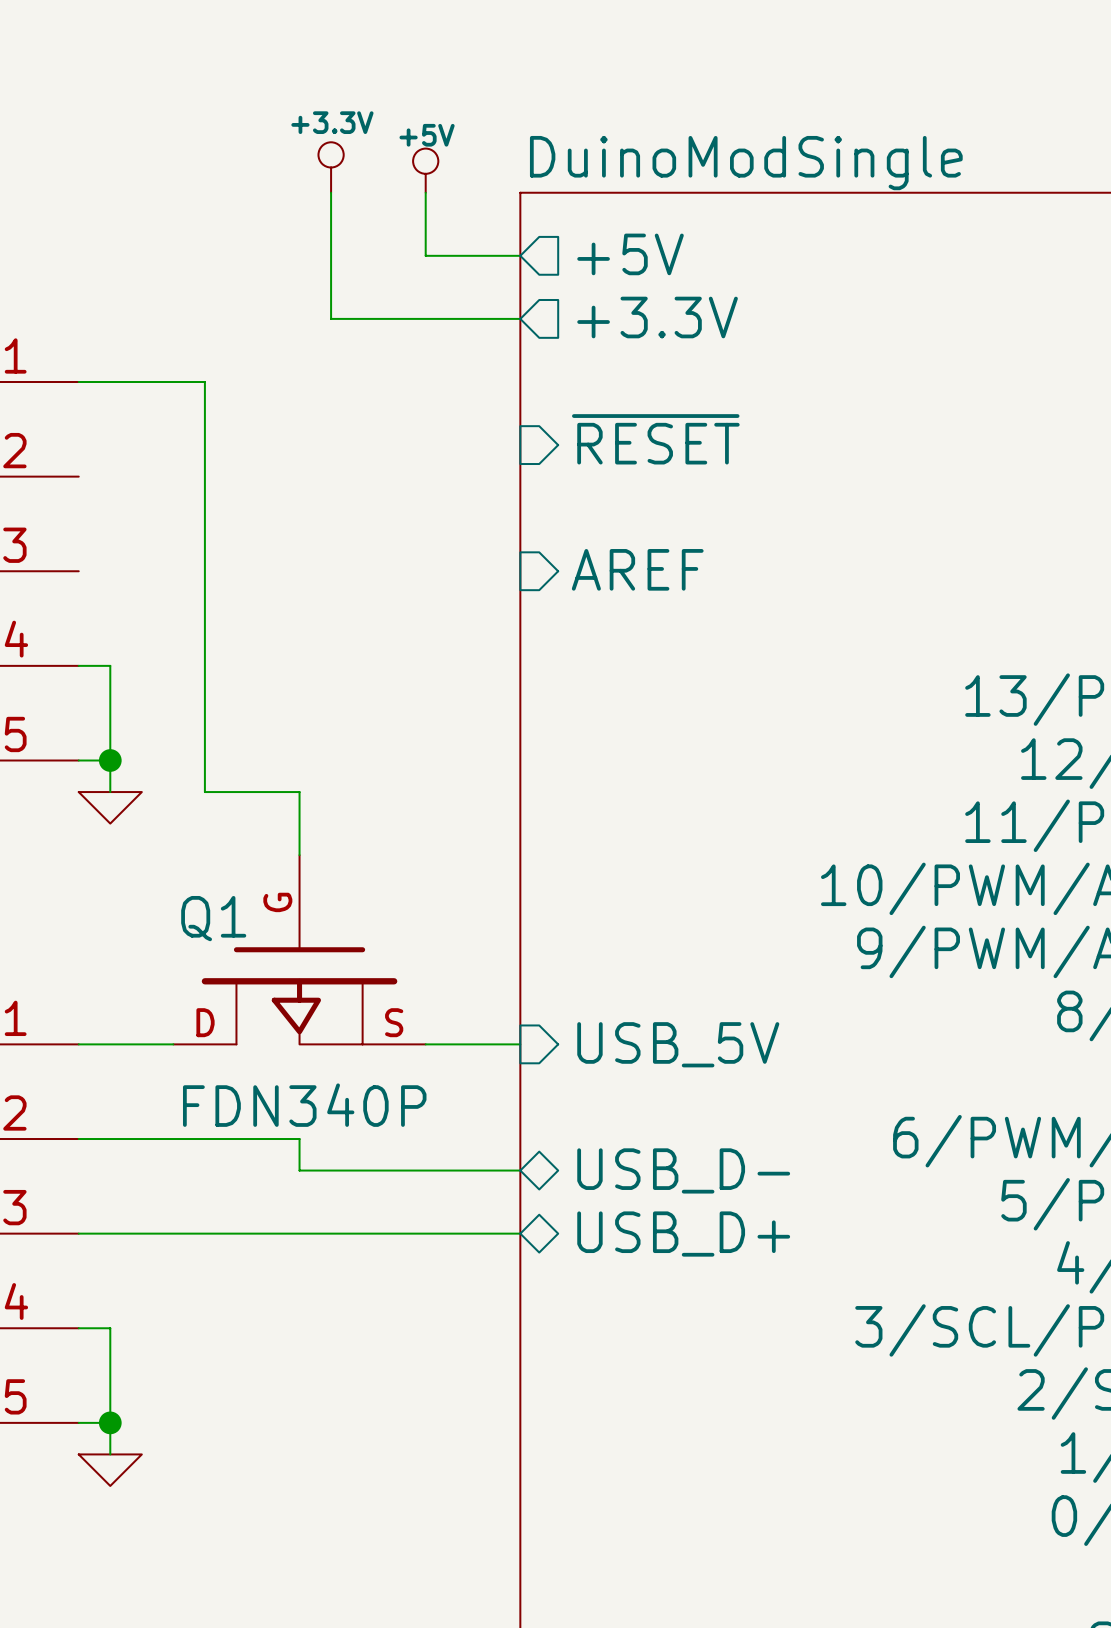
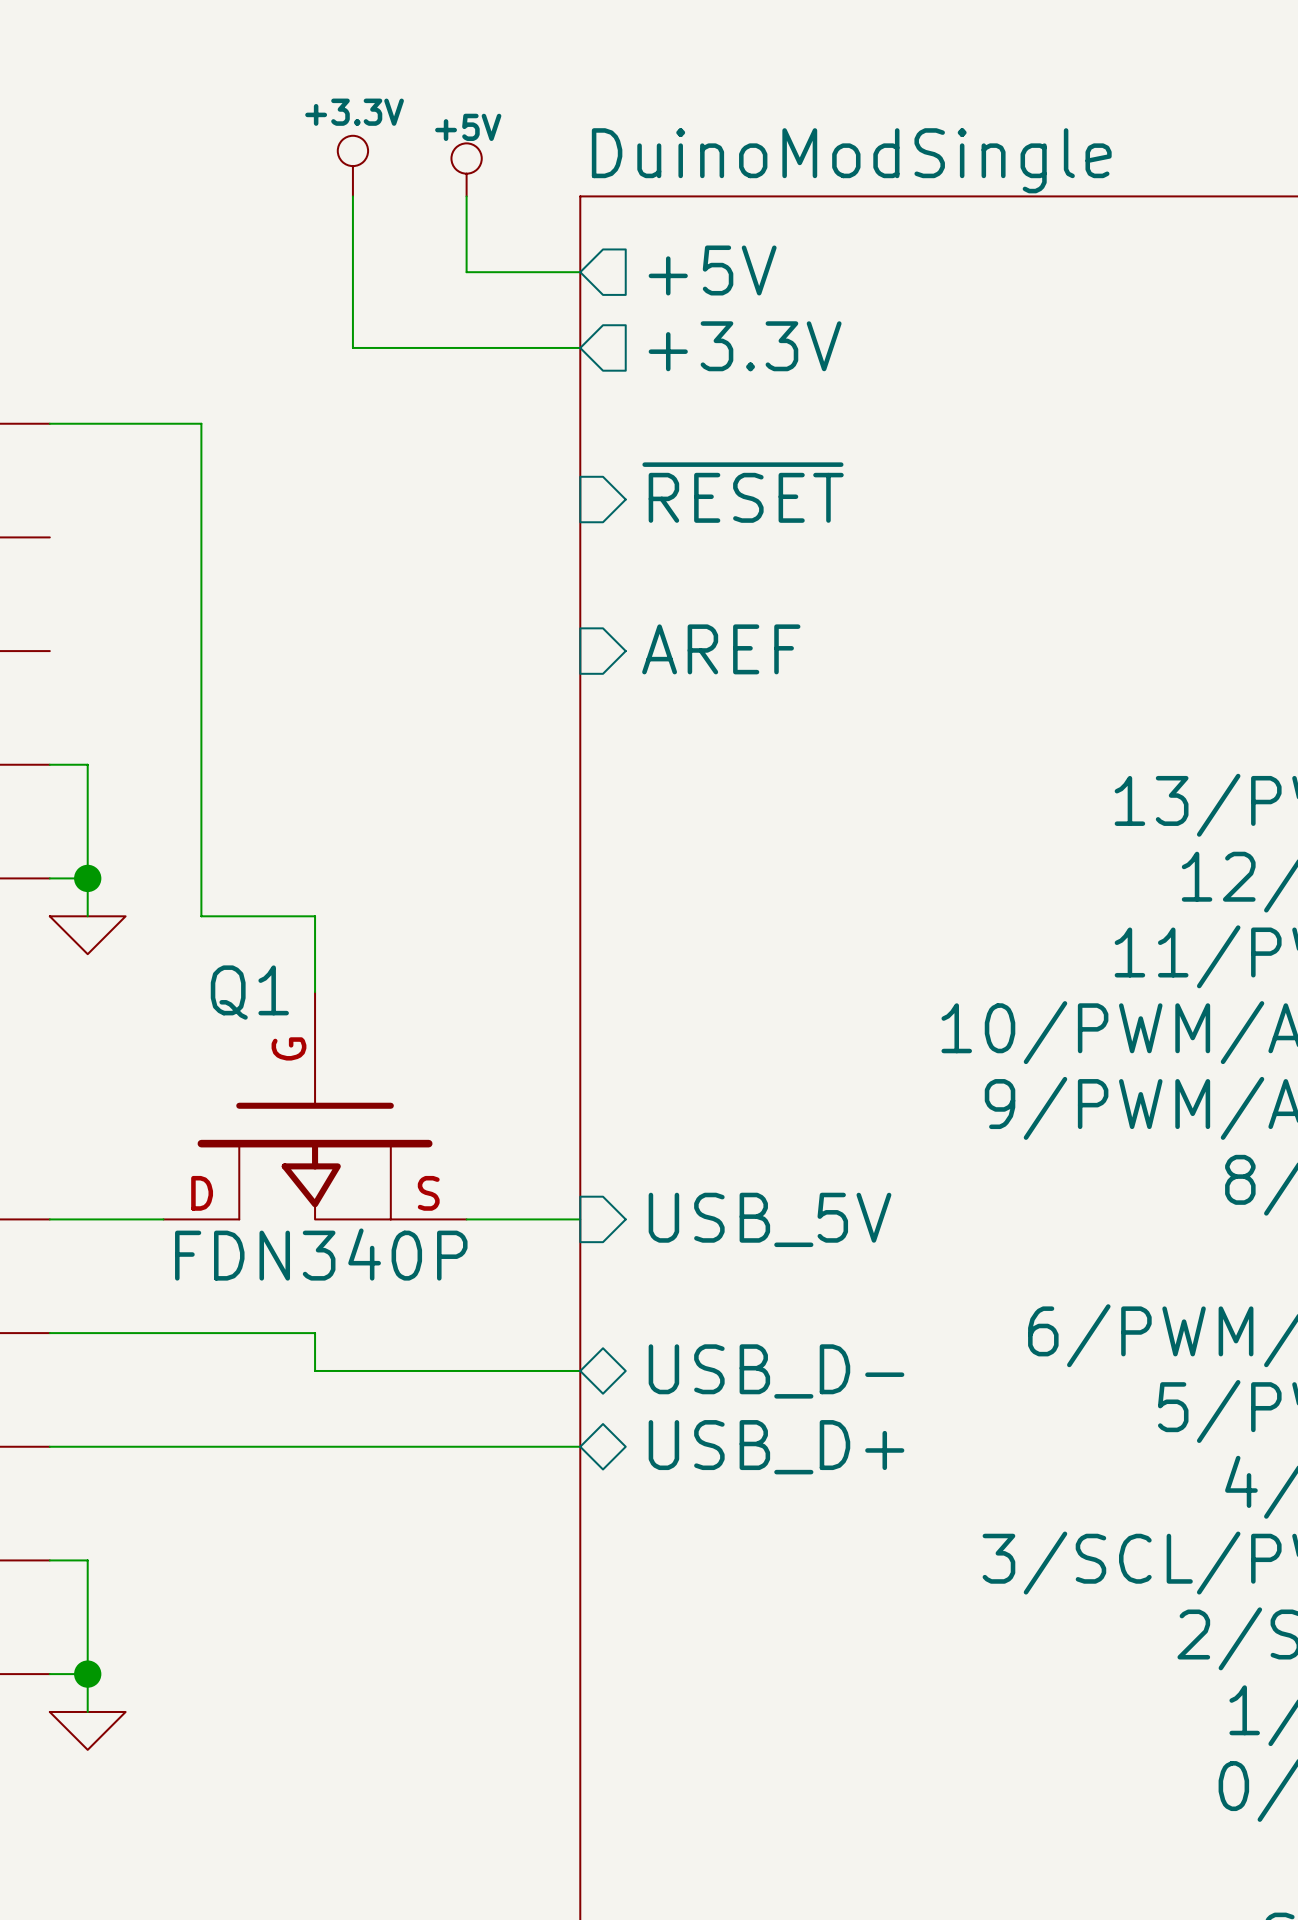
Q1 name position: Q1 (213, 918) -> Q1 (249, 992)
Q1 value position: FDN340P (304, 1105) -> FDN340P (321, 1254)

